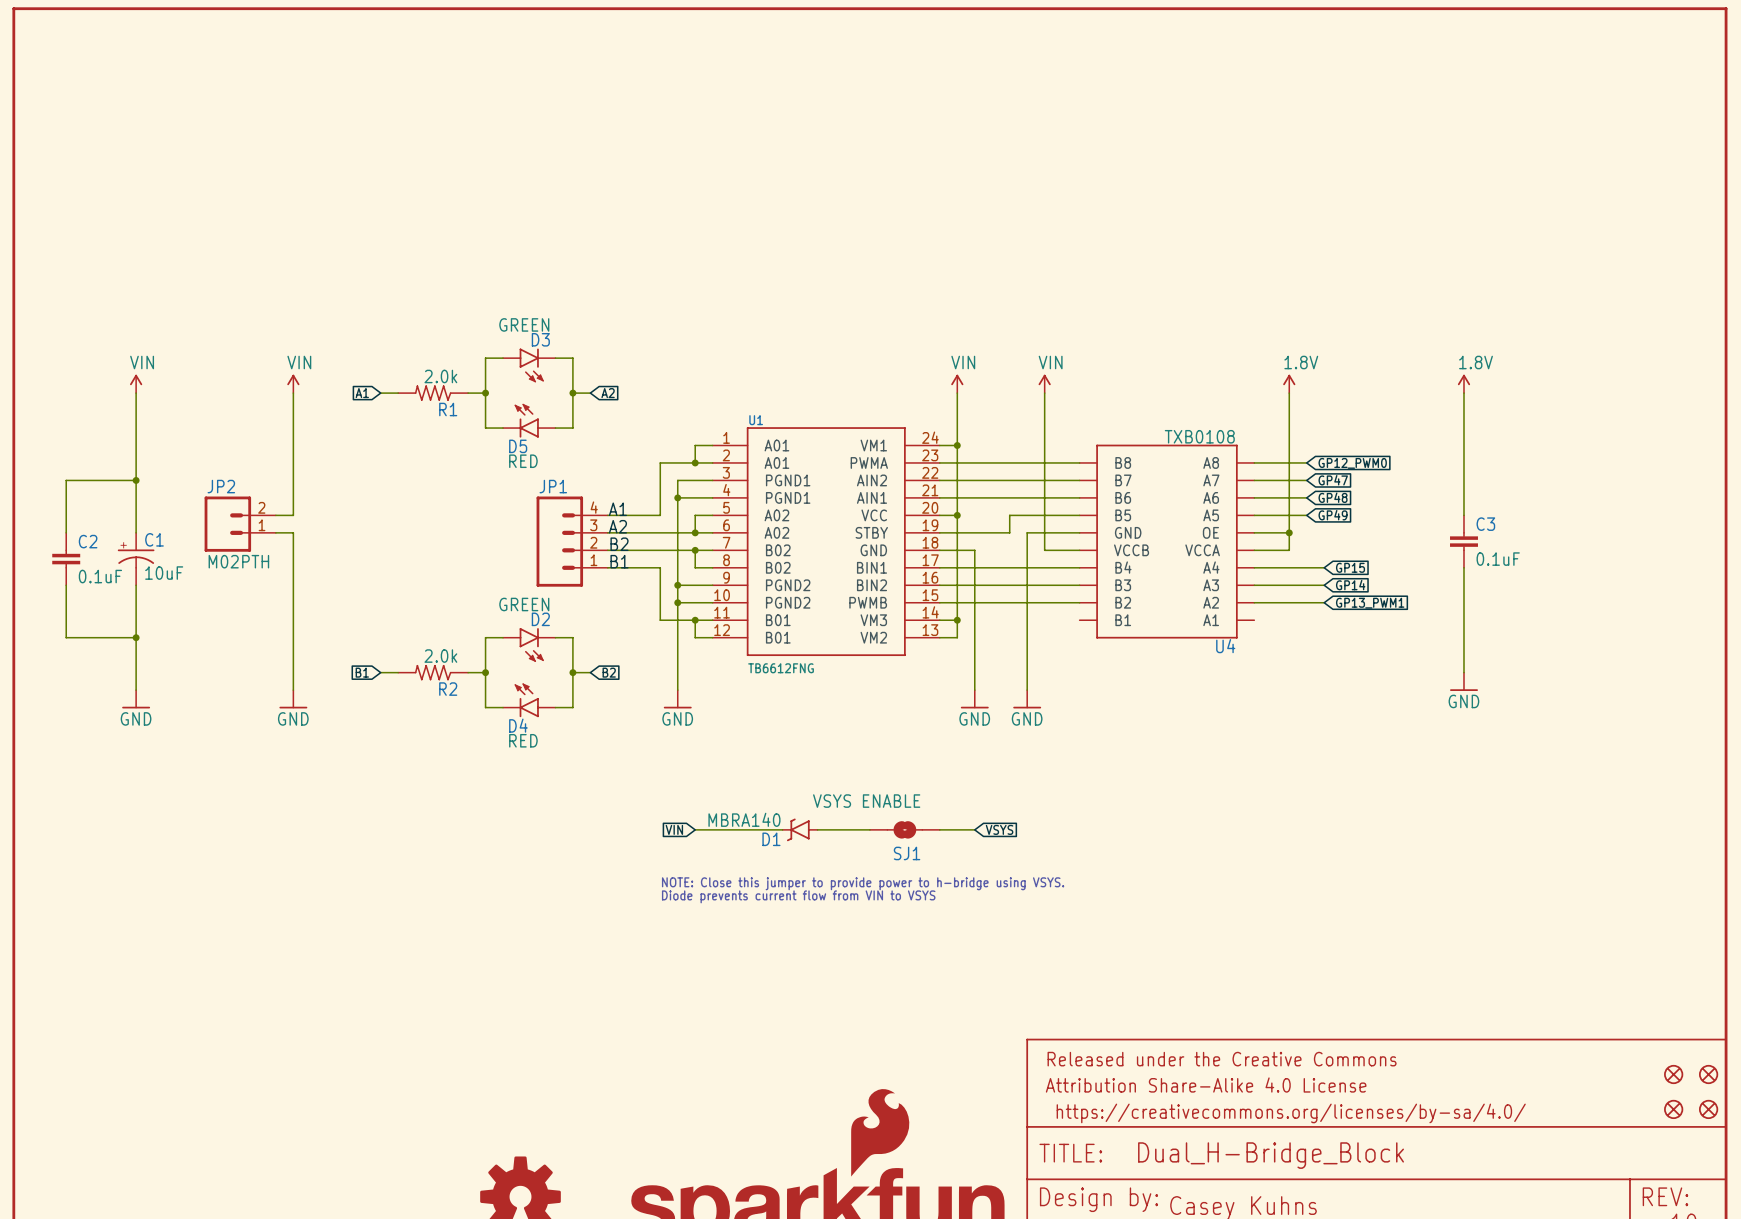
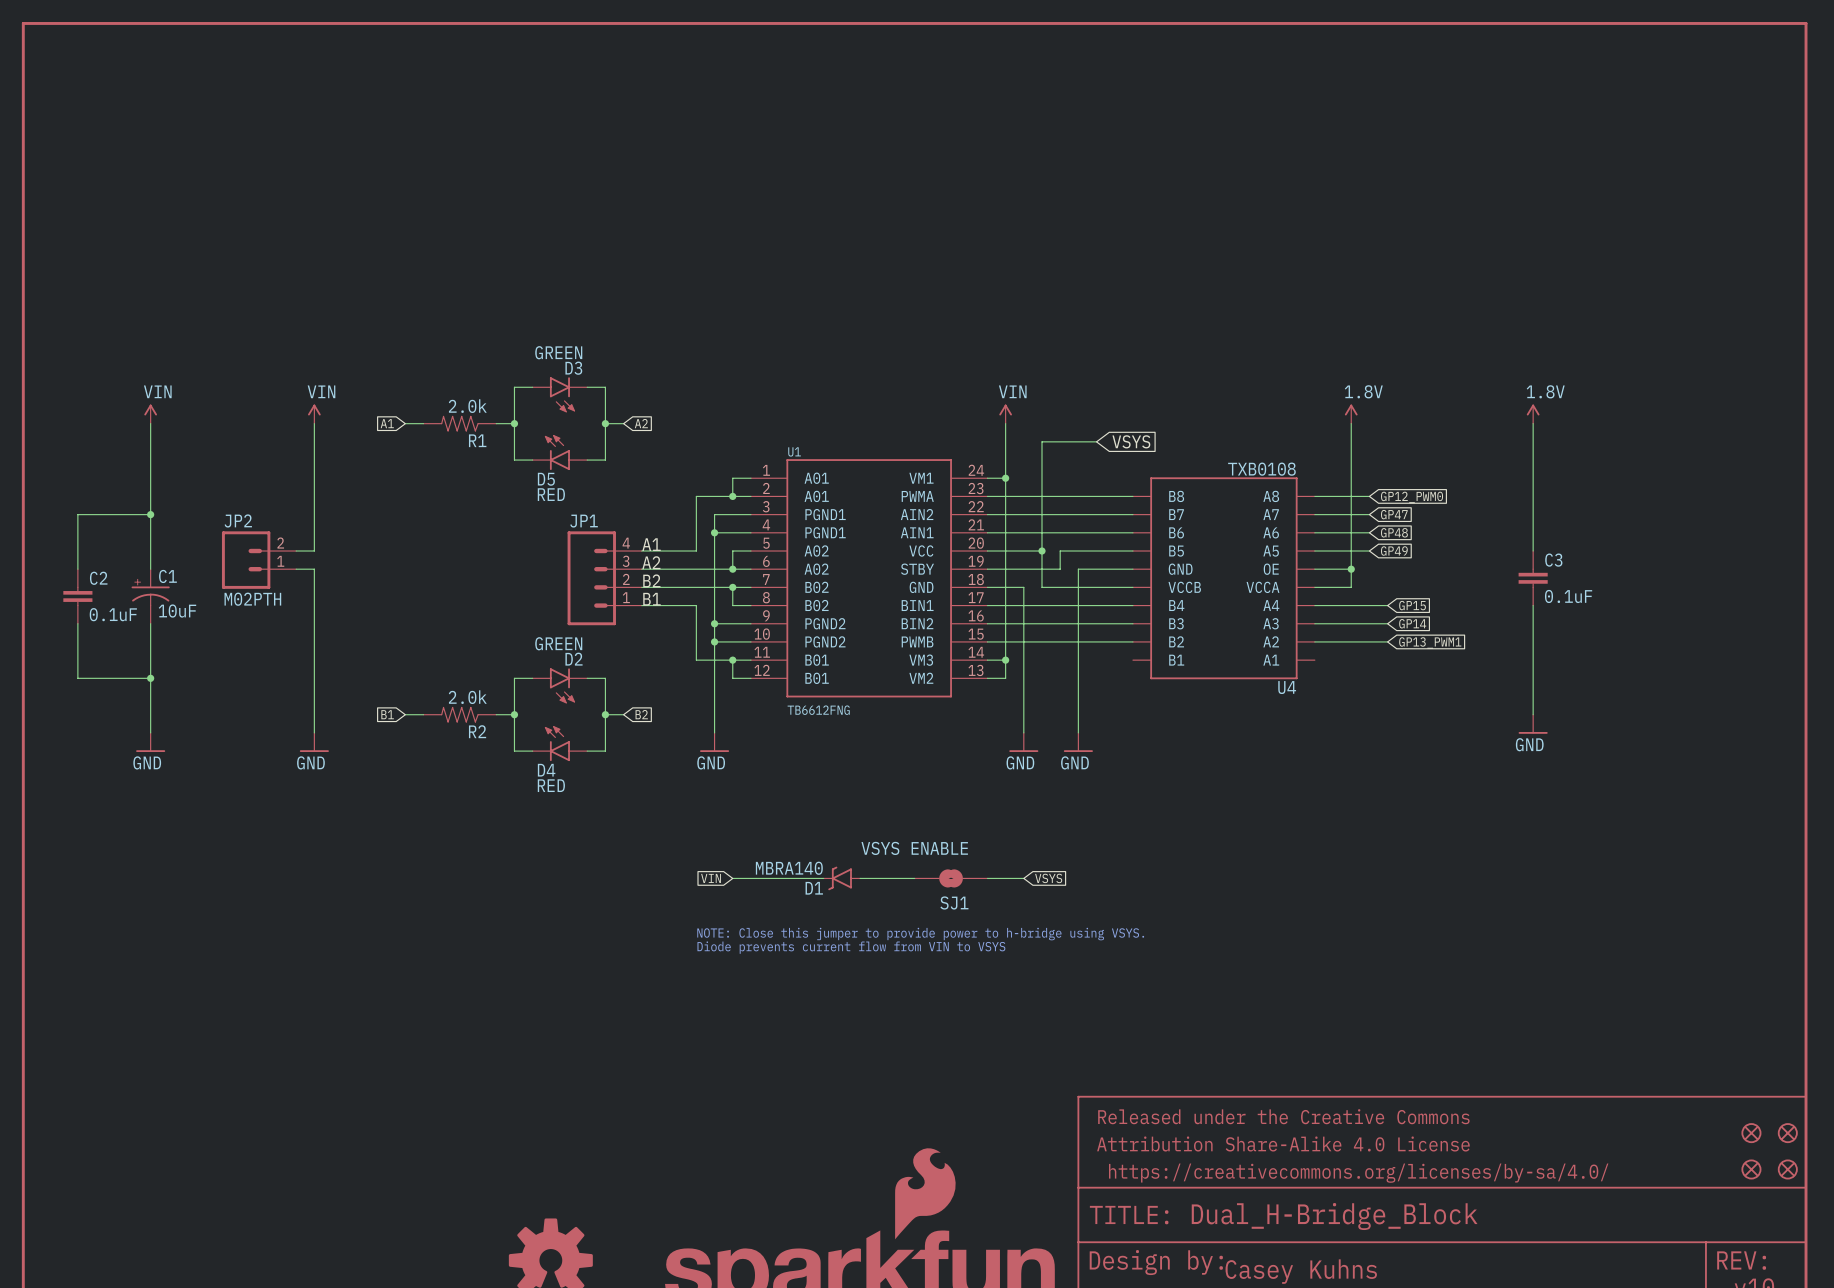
power symbol: VIN (1044, 383) -> none
wire: (1044, 393) (1044, 550) -> (1096, 441) (1042, 441) (1042, 587) (1096, 587)
global label: none -> VSYS (1131, 441)
wire: none -> (1005, 551) (1042, 551)
junction position: (957, 515) -> (1042, 551)

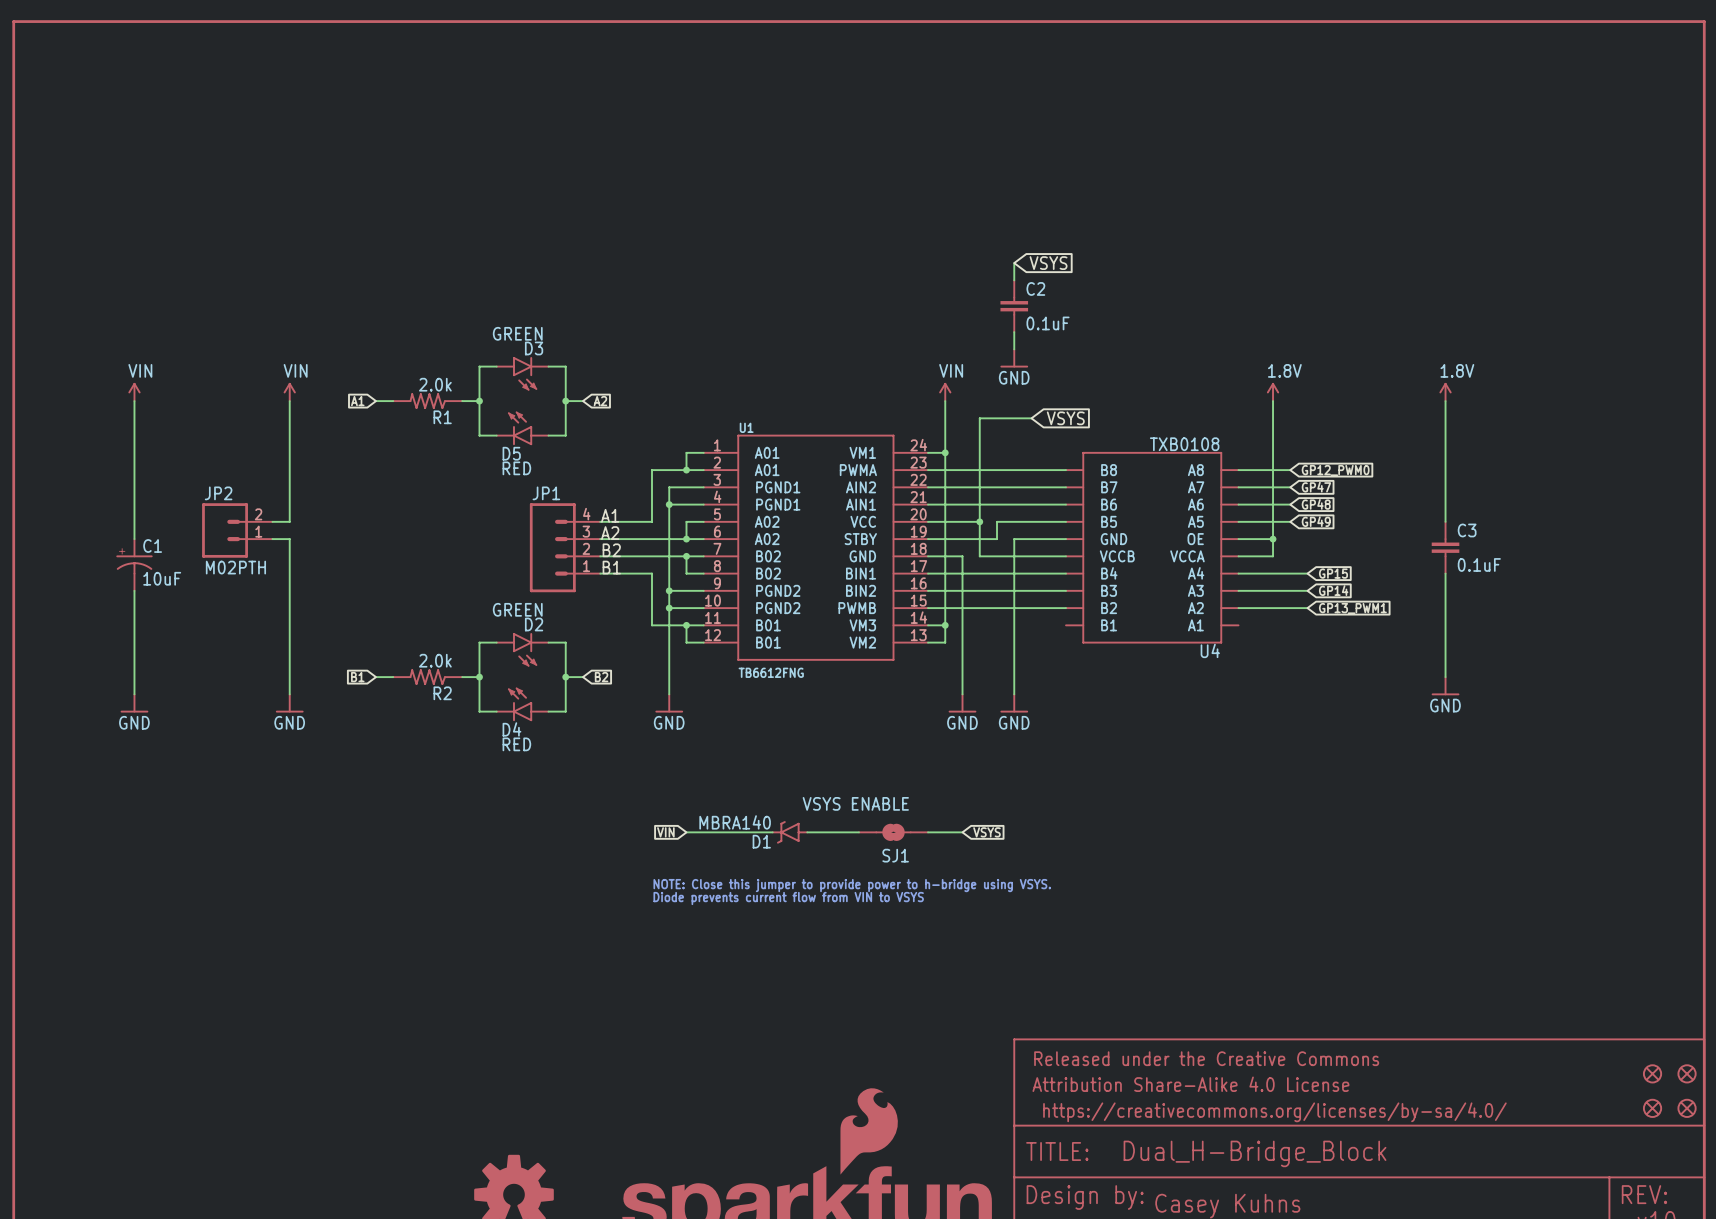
wire: none -> (1014, 263) (1014, 280)
global label: none -> VSYS (1048, 263)
wire: none -> (1014, 332) (1014, 349)
power symbol: none -> GND (1014, 358)
wire: (150, 514) (77, 514) (77, 569) -> none
junction: (150, 514) -> none
C2 position: (77, 596) -> (1014, 306)
wire: (77, 623) (77, 678) (150, 678) -> none
junction: (150, 678) -> none

